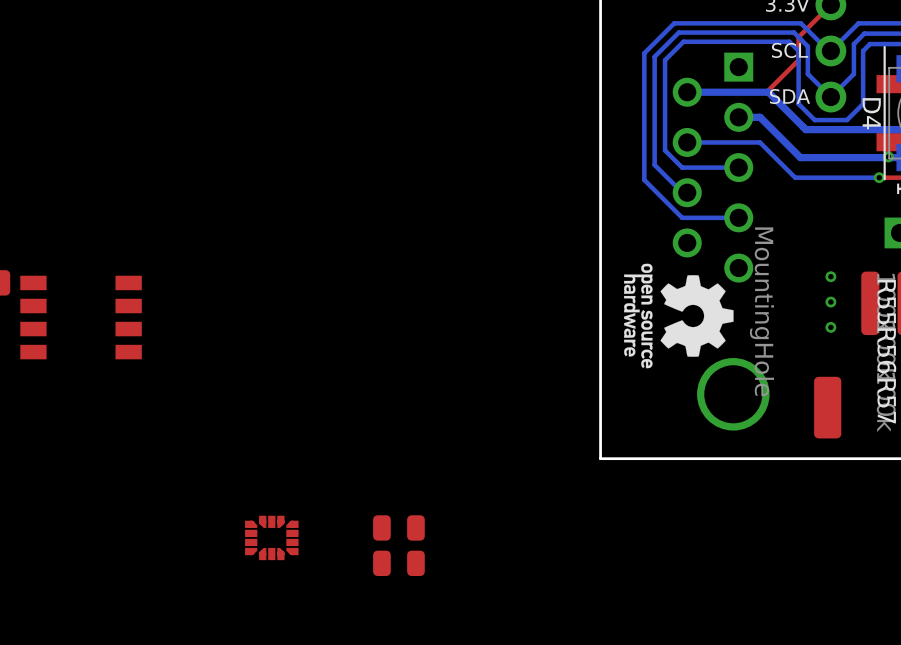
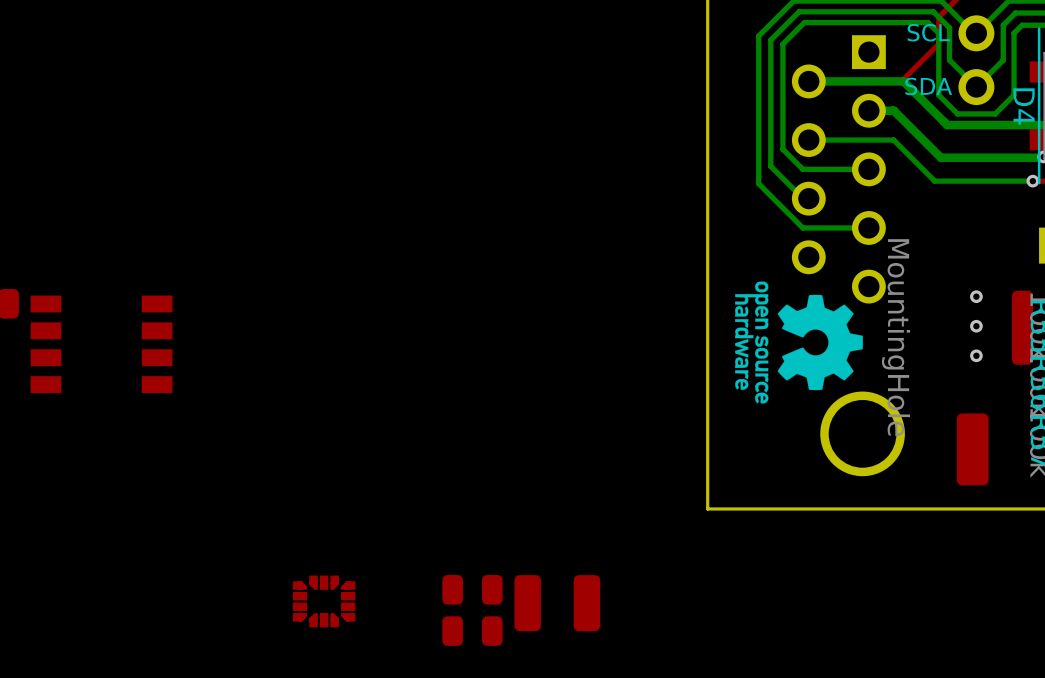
part: none -> (557, 603)

